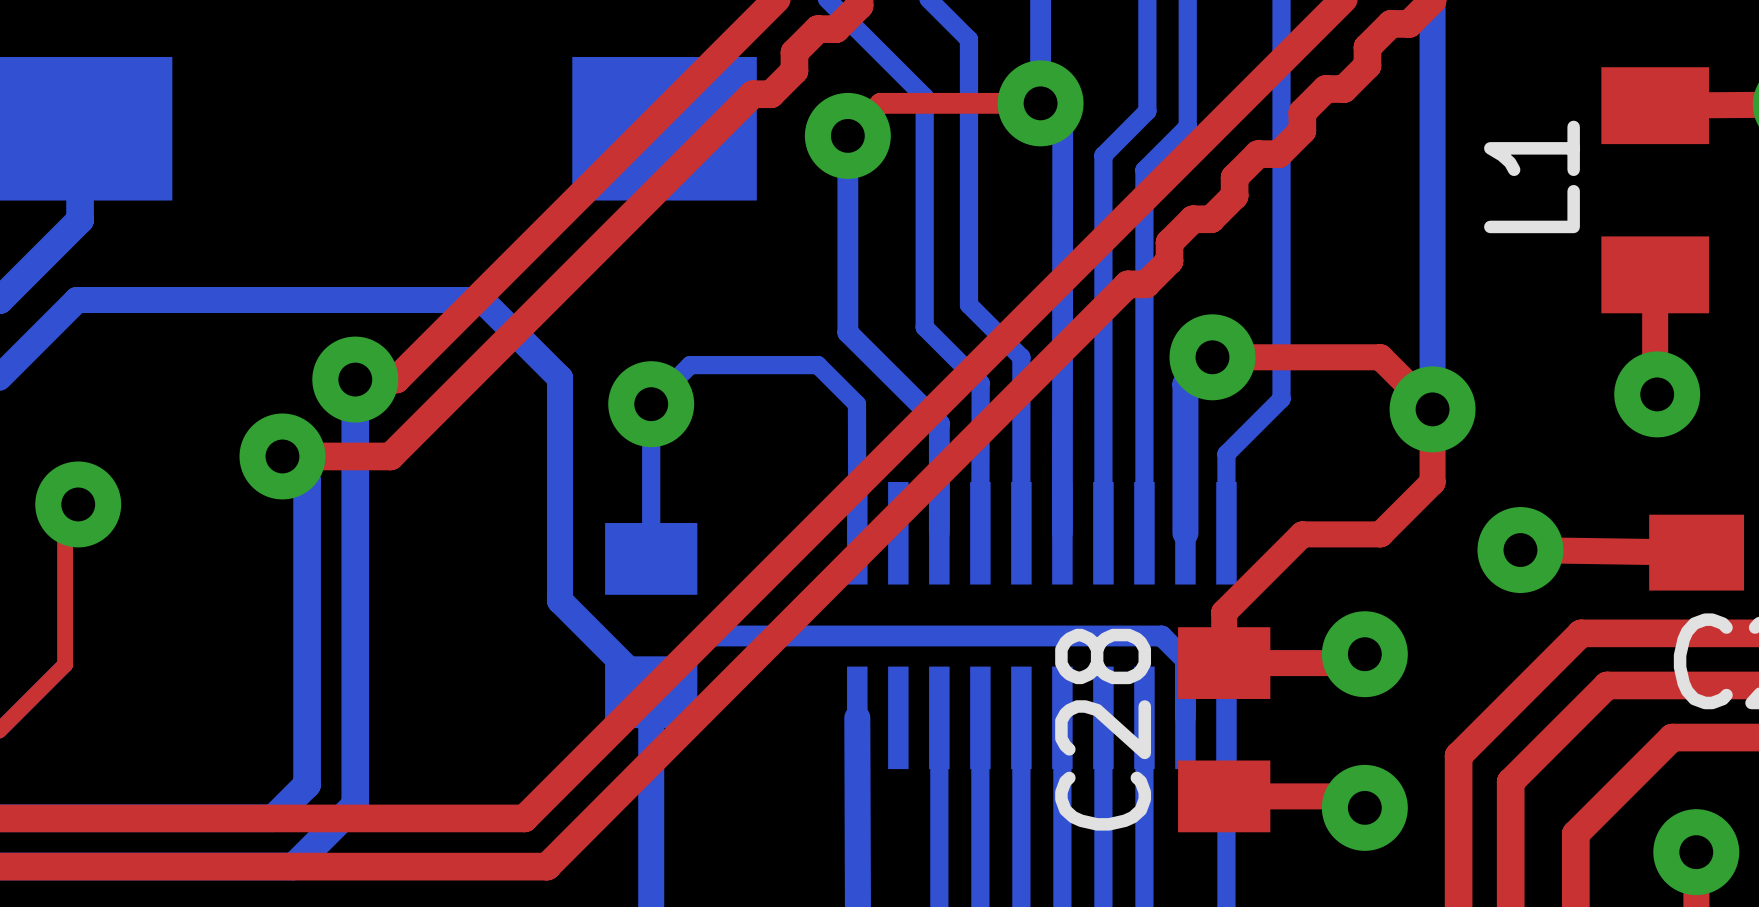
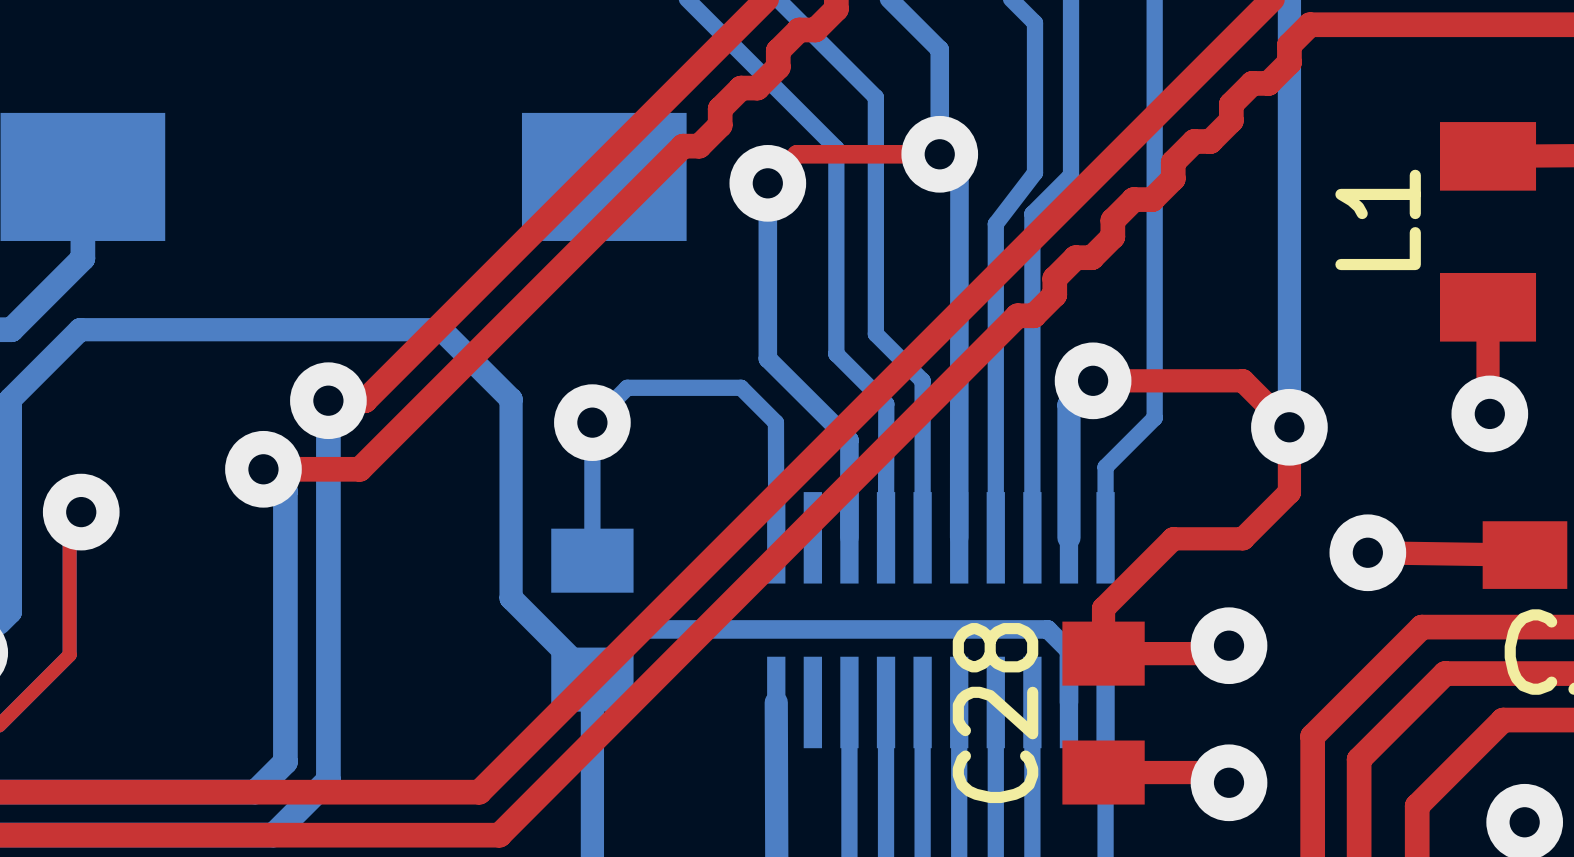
bottom track: (1147, 111) (1103, 155) (1103, 181) -> (1035, 161) (1035, 172) (995, 223)

